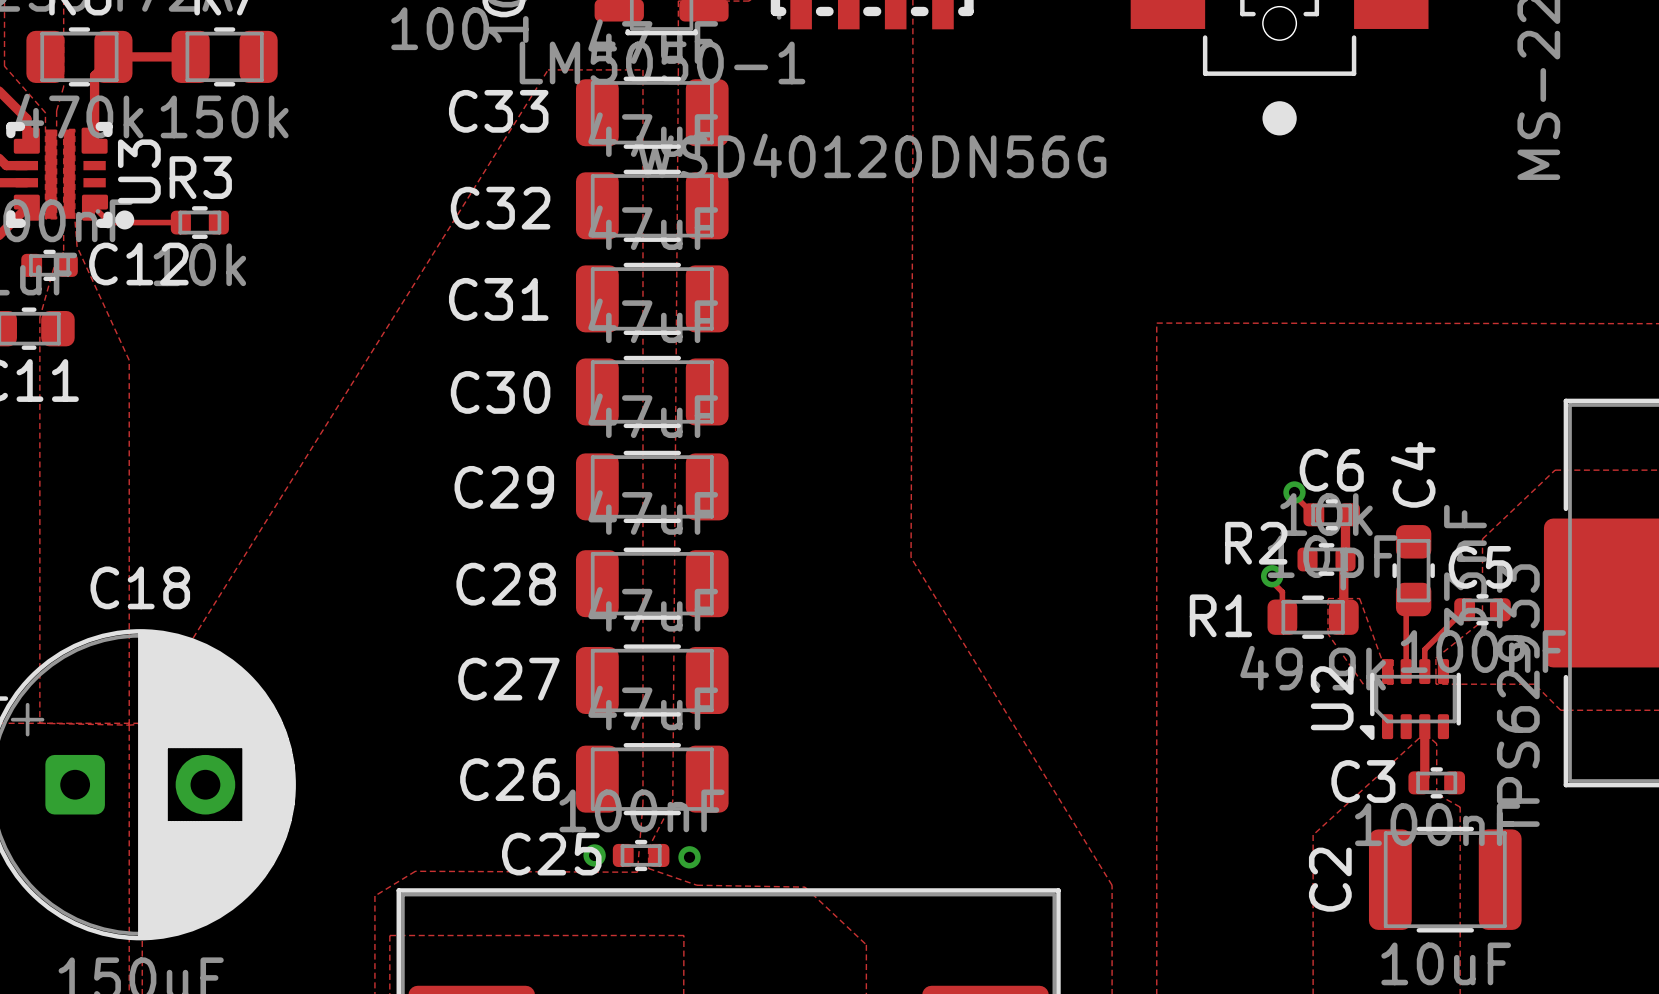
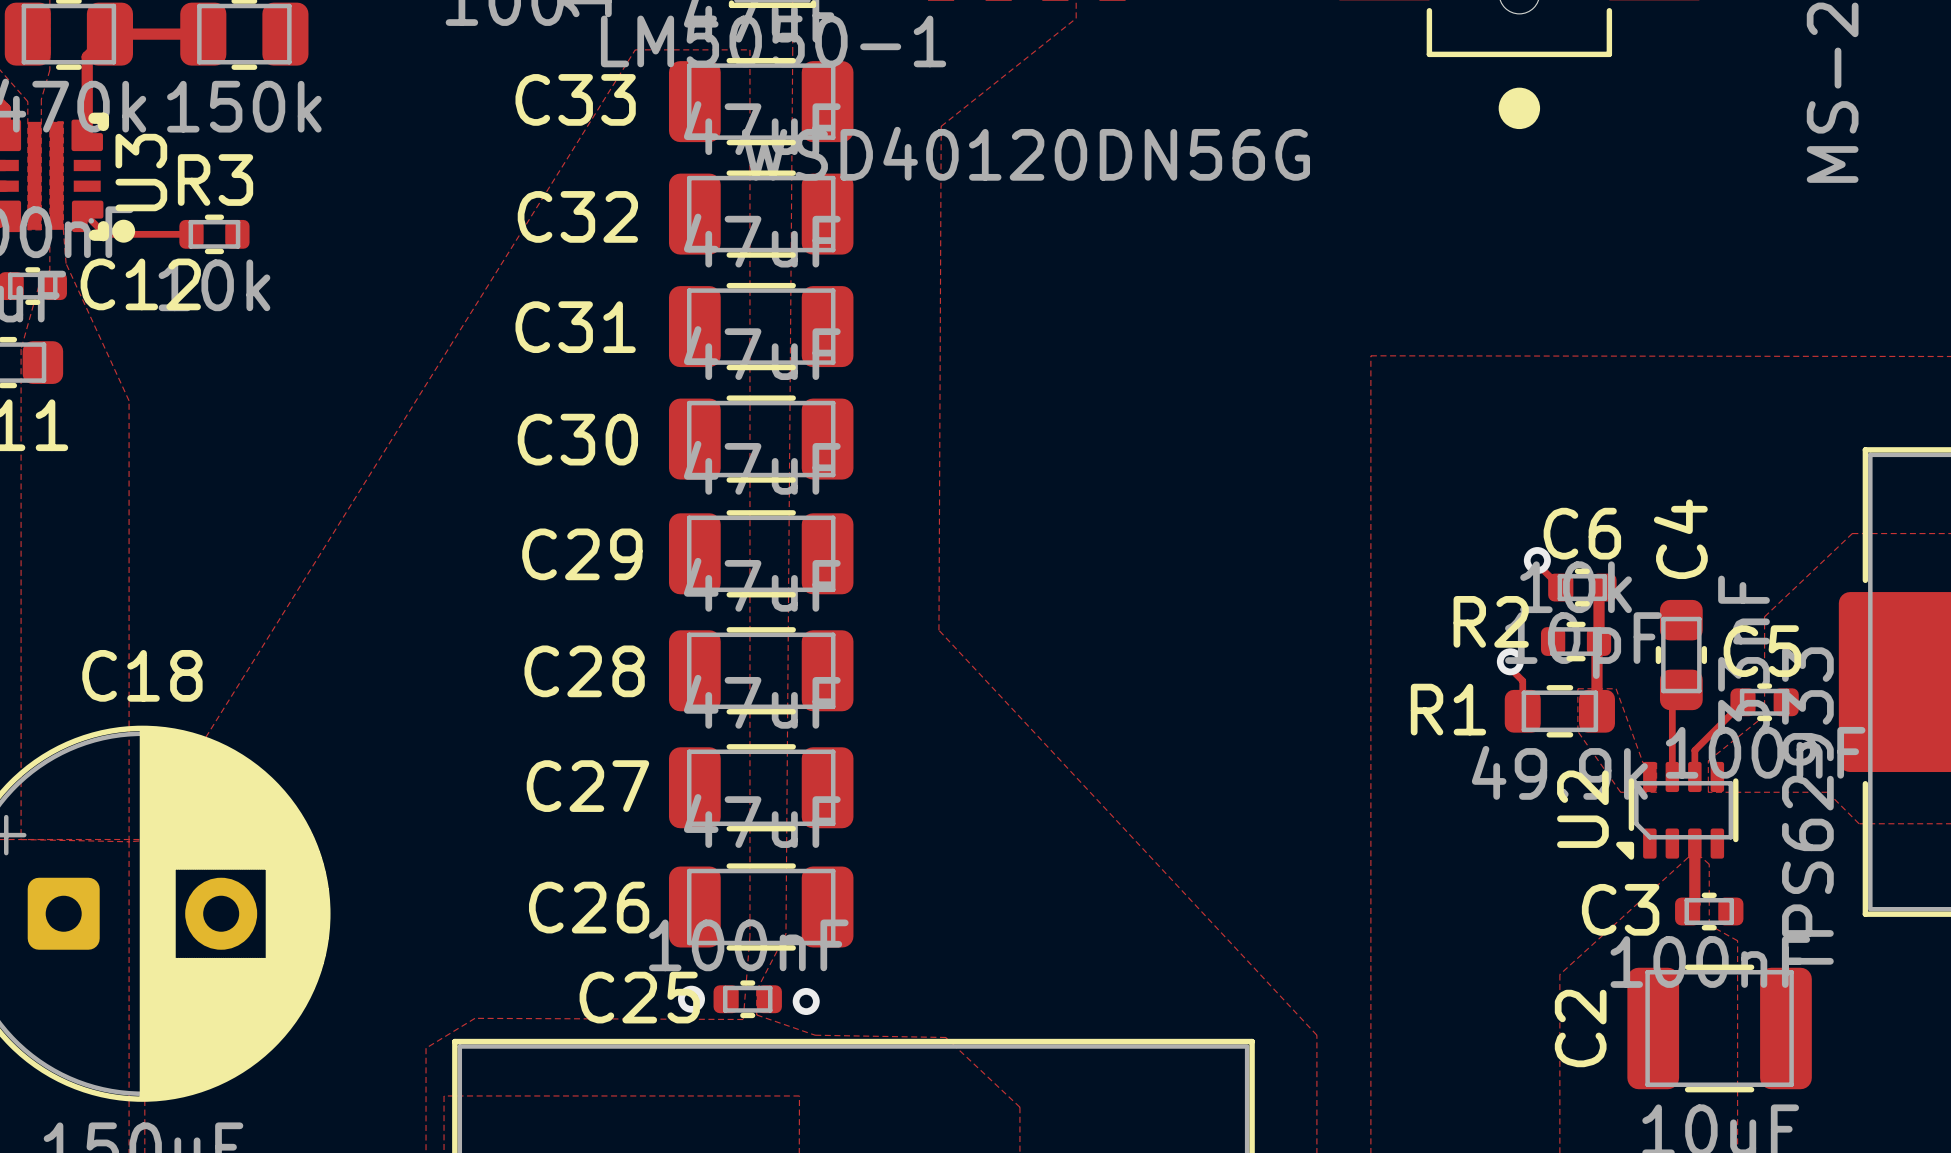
zone outline: (912, 43) (911, 557) (1112, 885) -> (1076, 18) (941, 126) (938, 630) (1316, 1035)

